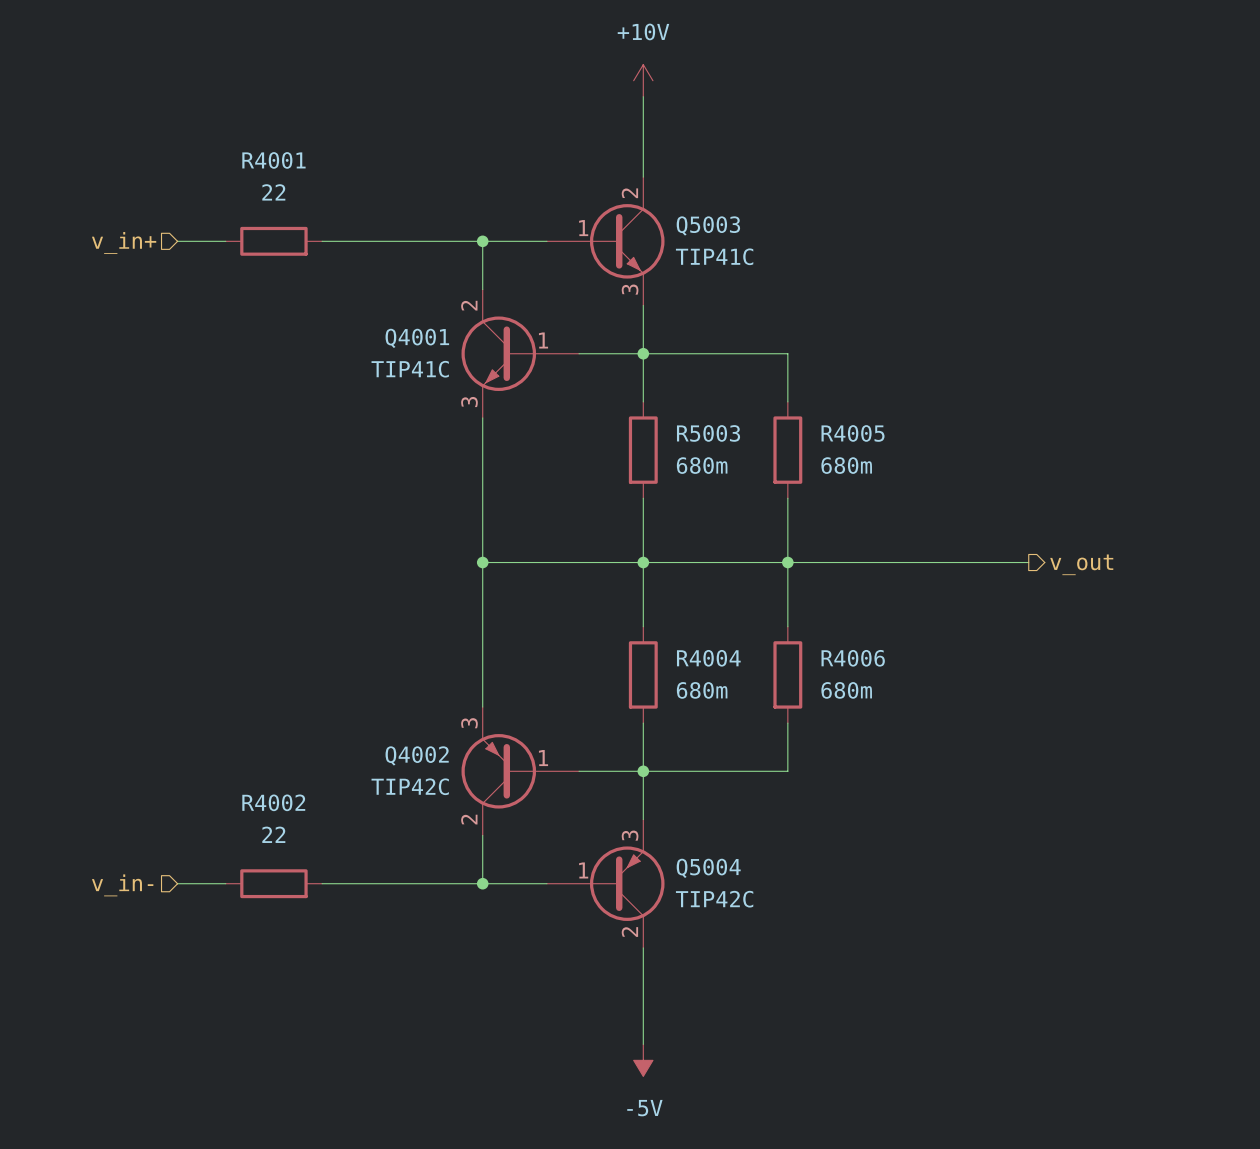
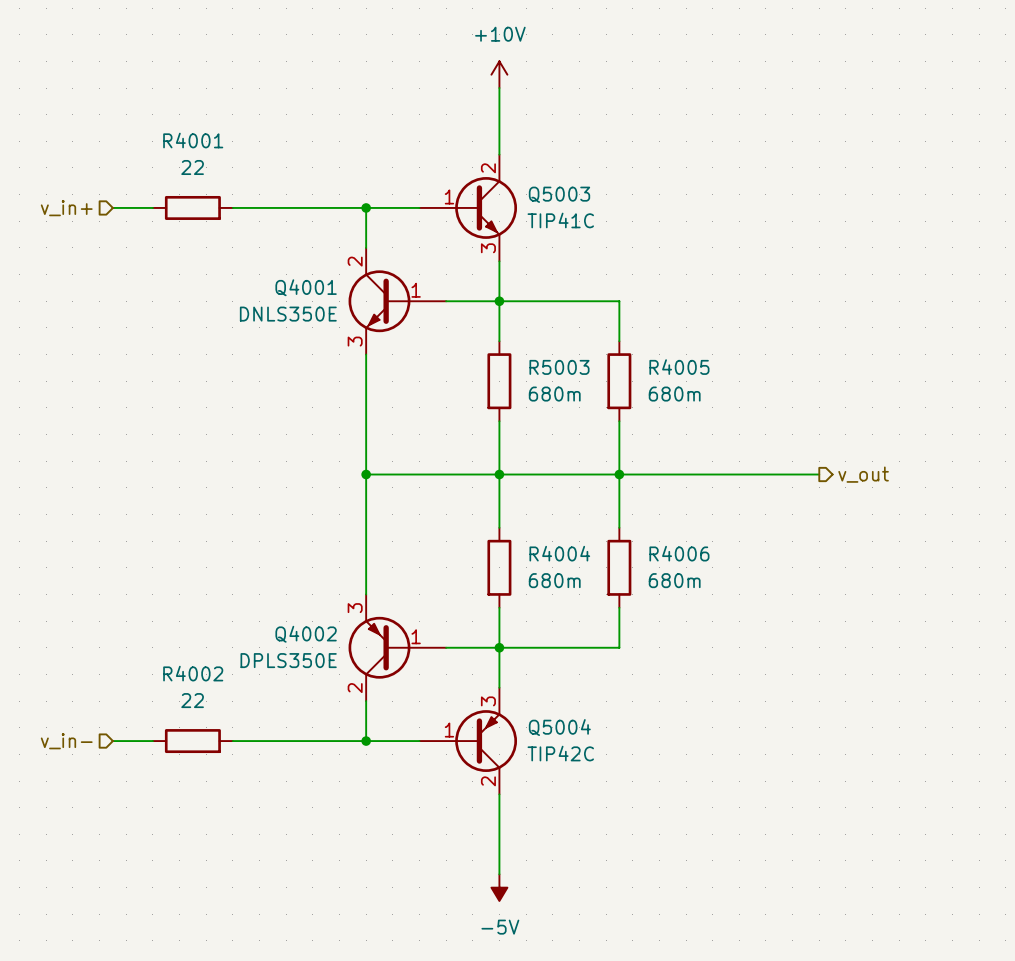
Q4001 value: TIP41C (410, 369) -> DNLS350E (288, 314)
Q4002 value: TIP42C (410, 786) -> DPLS350E (288, 660)

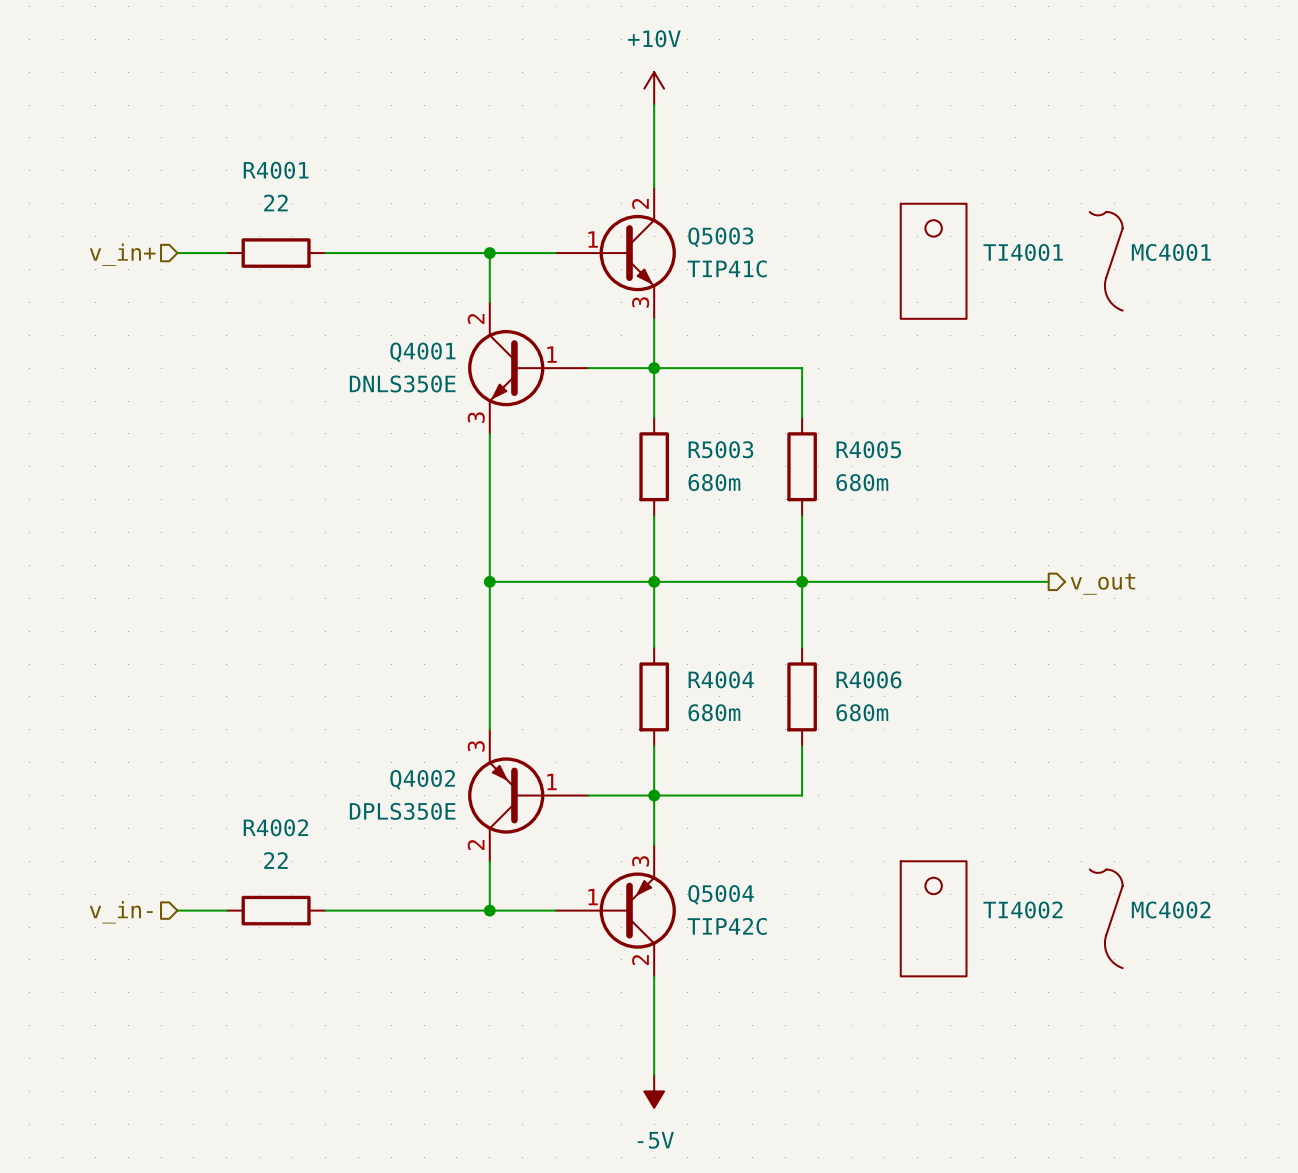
TI4001: none -> (933, 261)
MC4001: none -> (1106, 261)
TI4002: none -> (933, 918)
MC4002: none -> (1106, 918)

